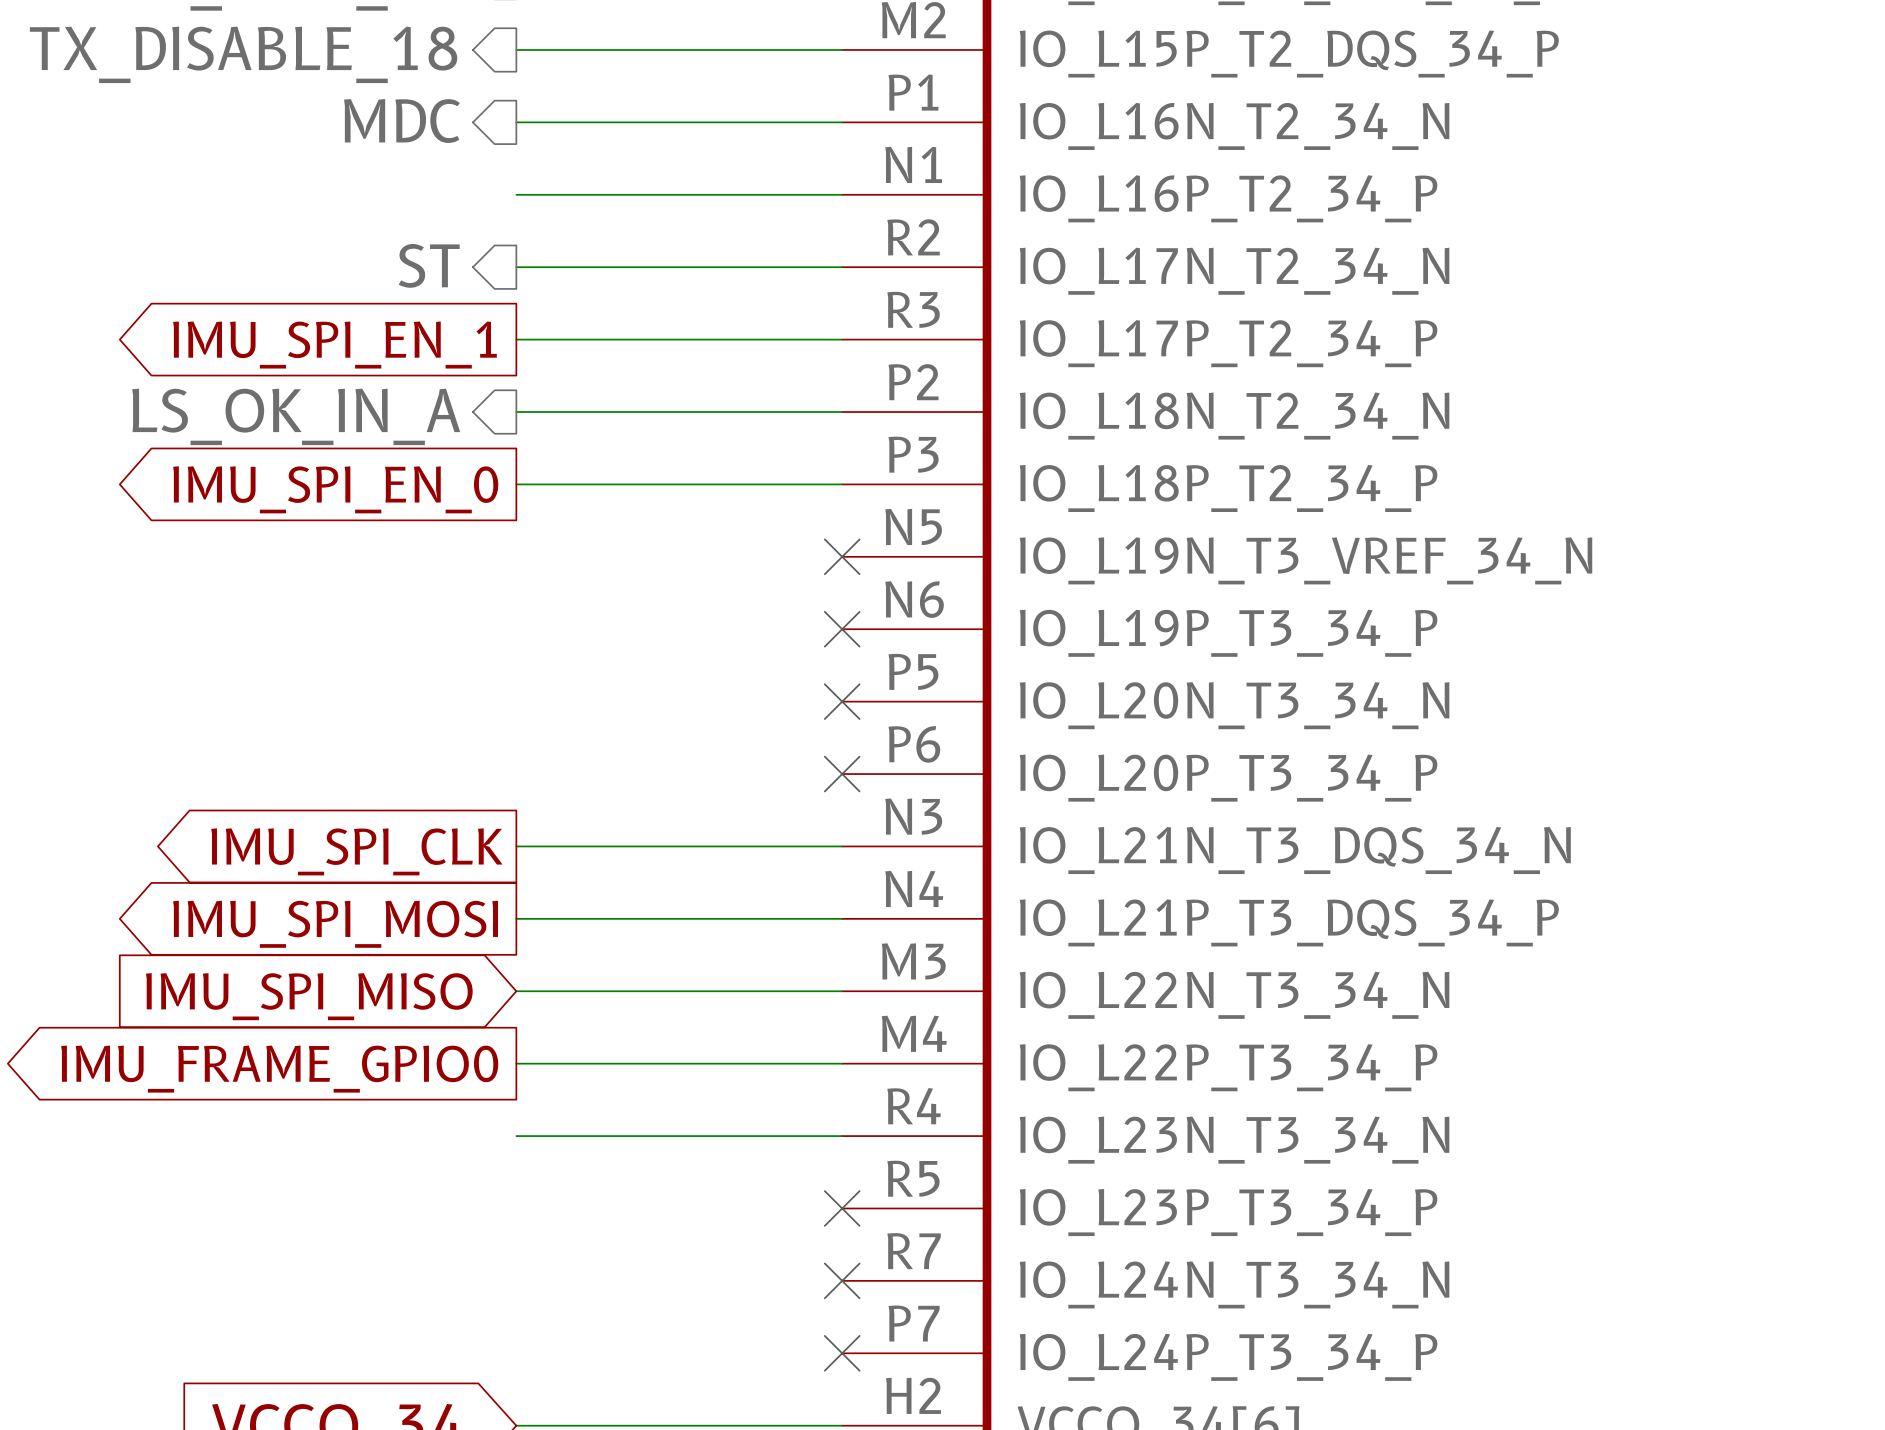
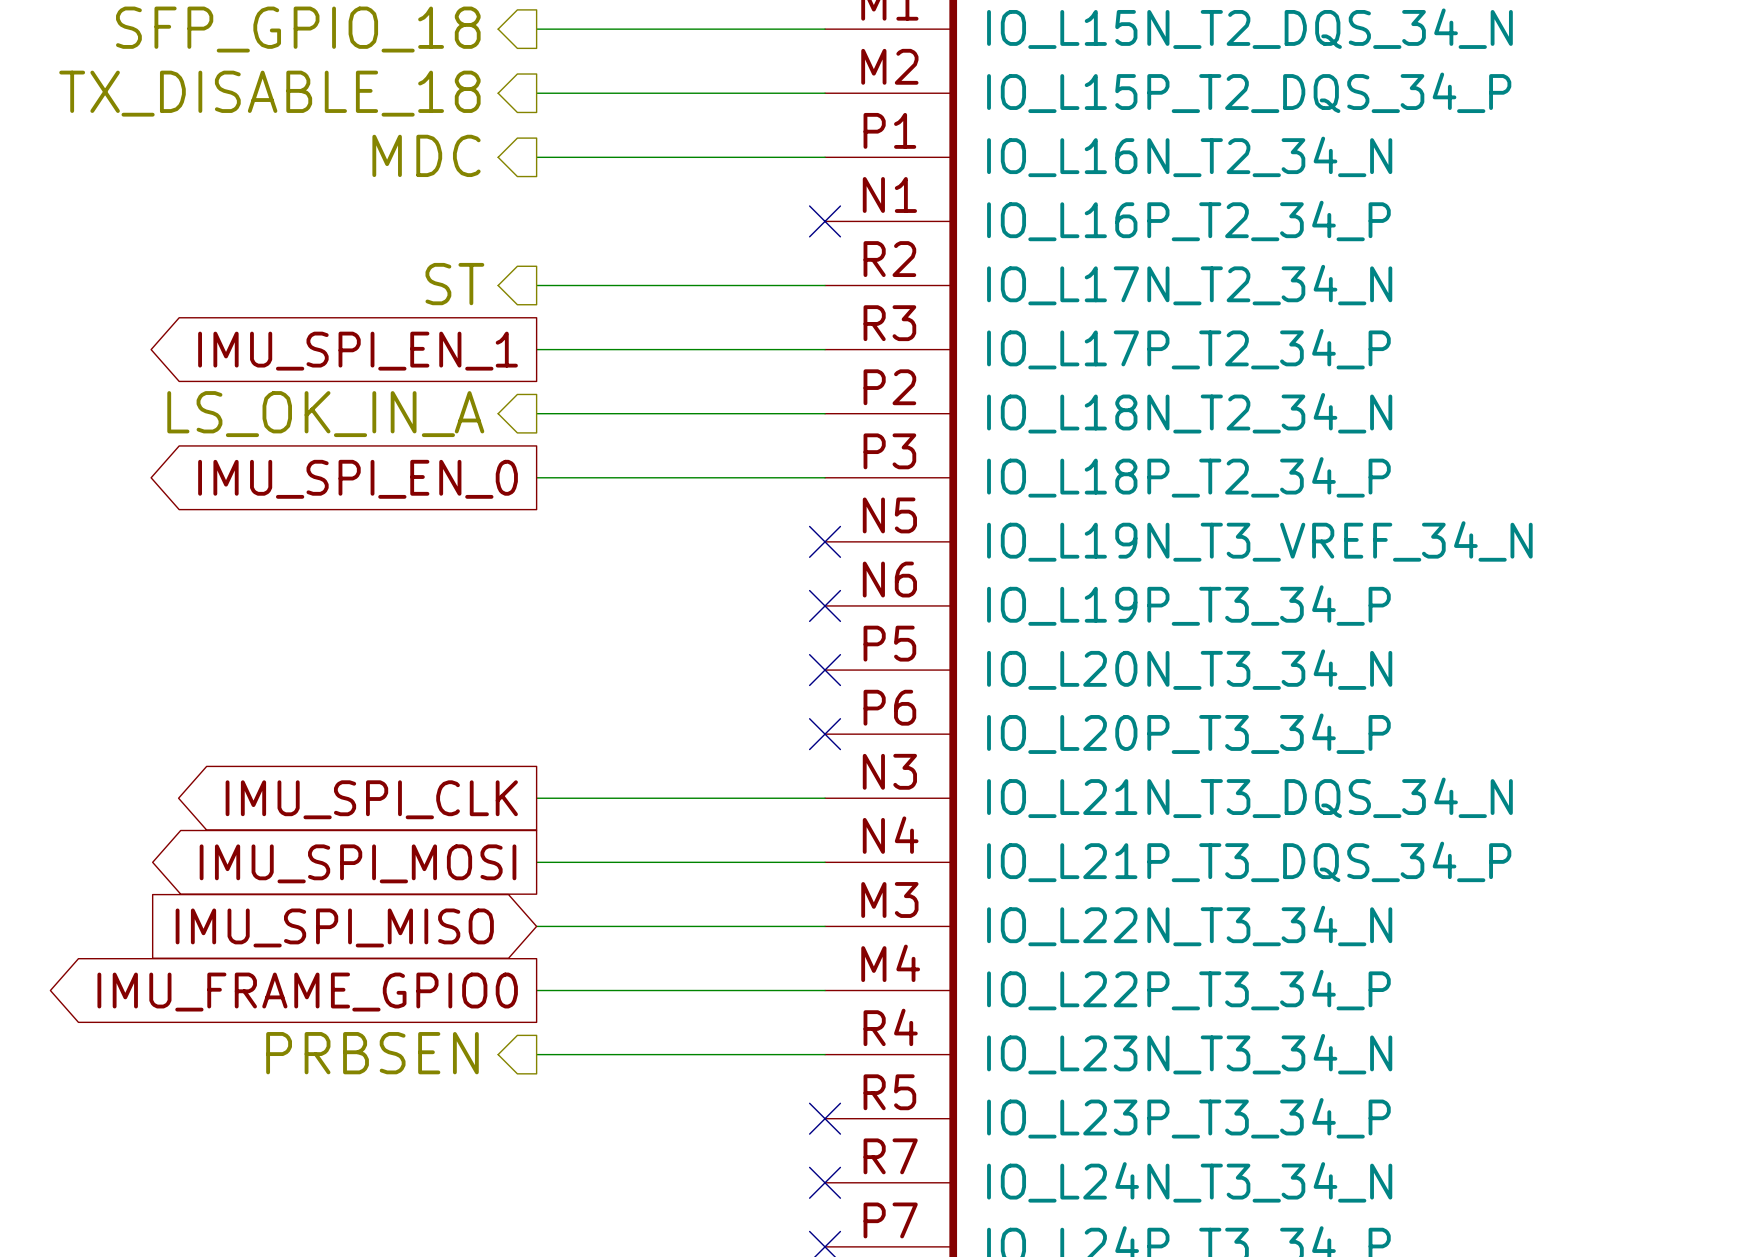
wire: (516, 194) (842, 194) -> none
no-connect mark: none -> (825, 221)
hierarchical label: none -> PRBSEN (372, 1053)

